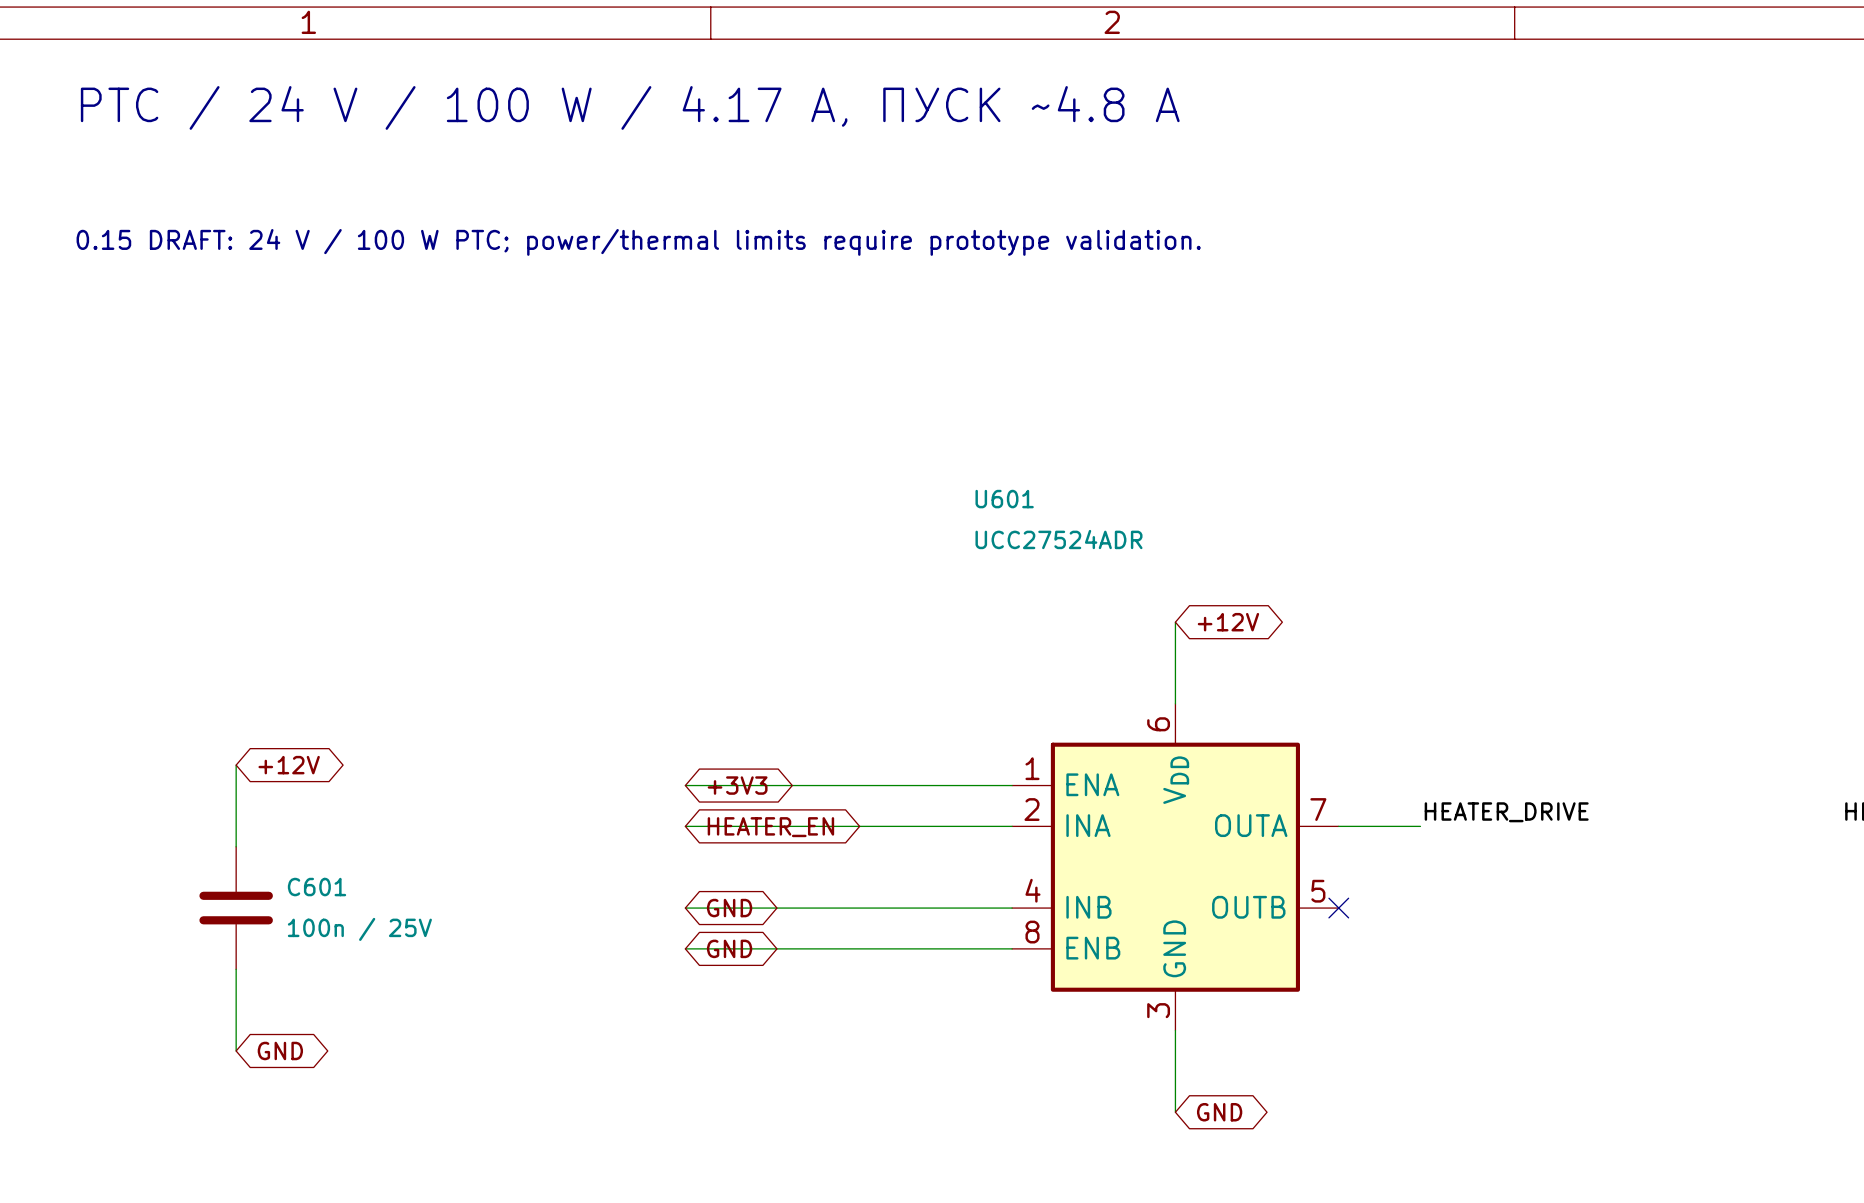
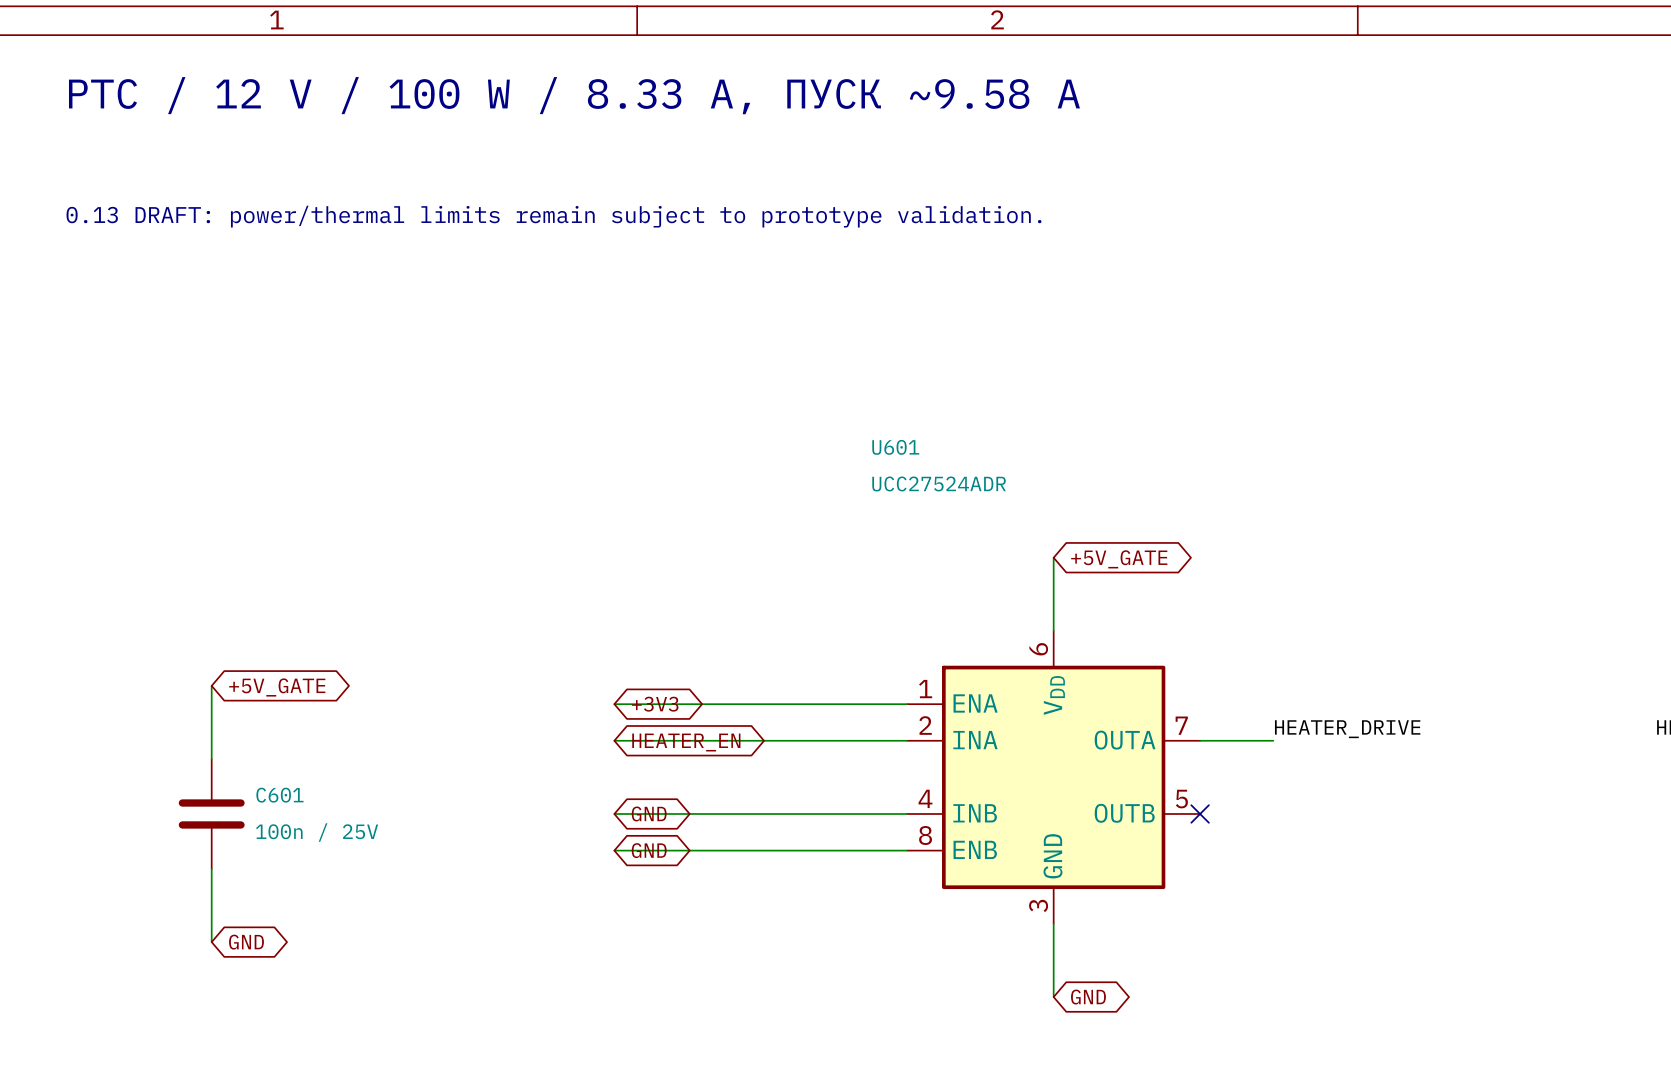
text: PTC / 24 V / 100 W / 4.17 A, ПУСК ~4.8 A (630, 107) -> PTC / 12 V / 100 W / 8.33 A, ПУСК ~9.58 A (574, 95)
text: 0.15 DRAFT: 24 V / 100 W PTC; power/thermal limits require prototype validation. (638, 242) -> 0.13 DRAFT: power/thermal limits remain subject to prototype validation. (553, 216)
global label: +12V (1228, 622) -> +5V_GATE (1119, 559)
global label: +12V (289, 765) -> +5V_GATE (277, 687)

